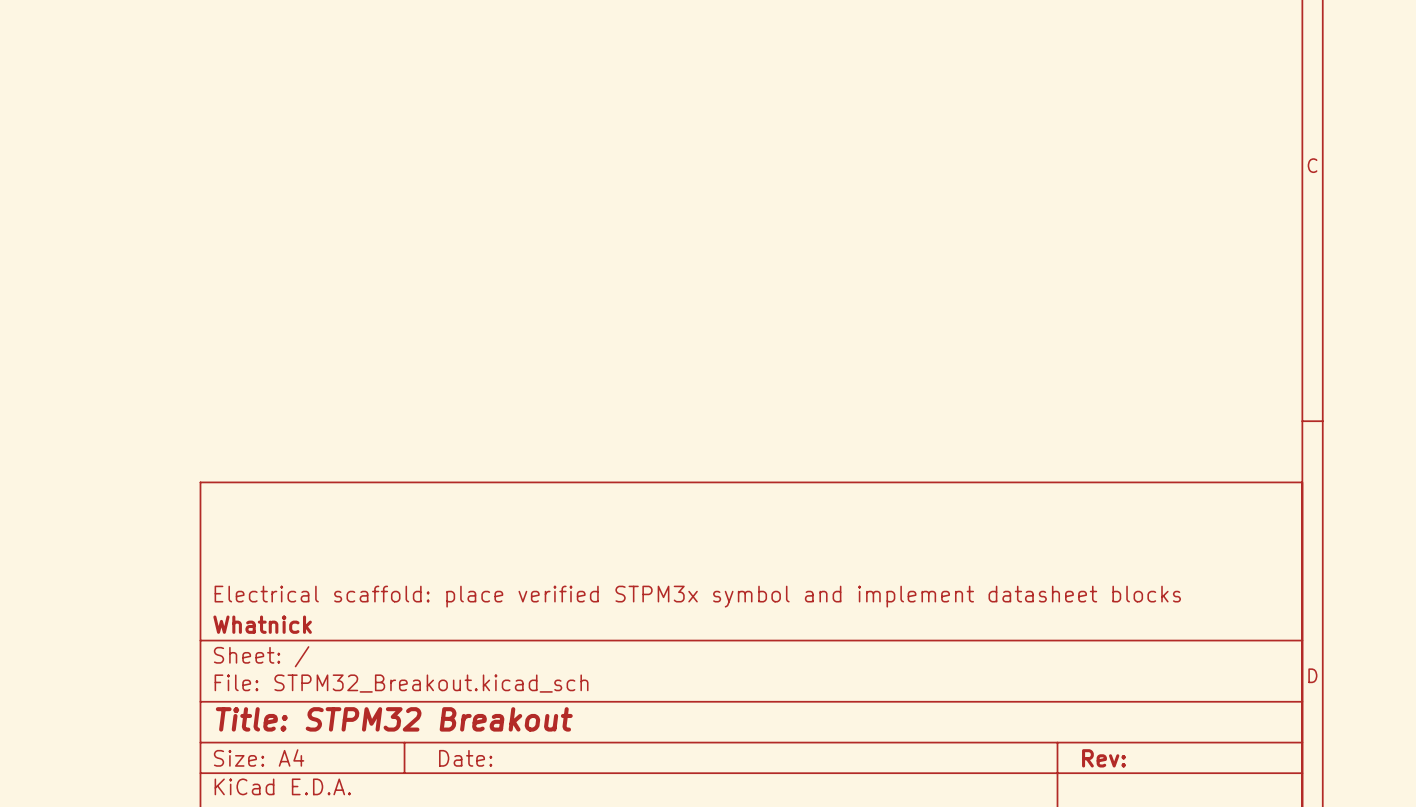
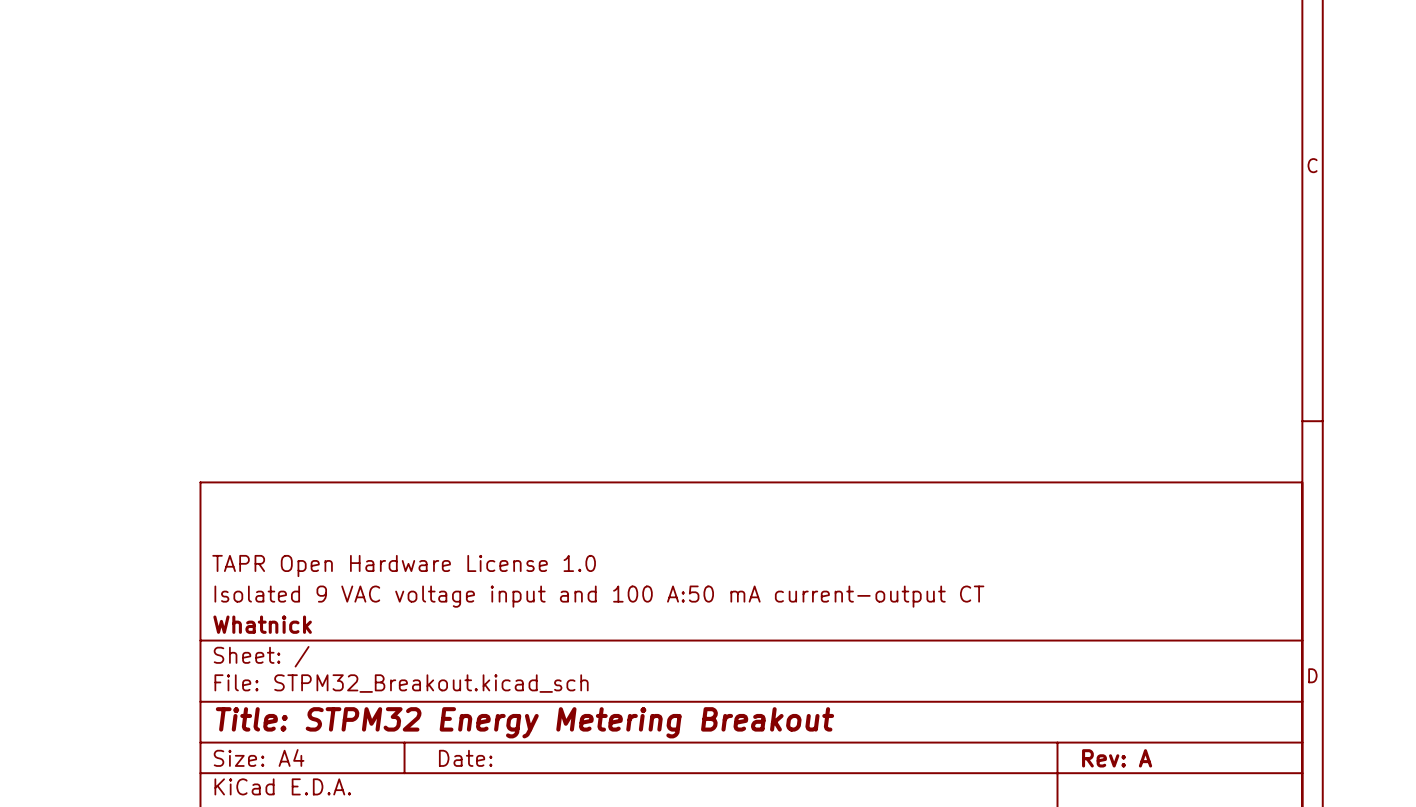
title block: none -> TAPR Open Hardware License 1.0 (404, 566)
title block: Electrical scaffold: place verified STPM3x symbol and implement datasheet blocks (697, 596) -> Isolated 9 VAC voltage input and 100 A:50 mA current-output CT (599, 596)
title block: Title: STPM32 Breakout (394, 719) -> Title: STPM32 Energy Metering Breakout (524, 722)
title block: Rev: (1103, 758) -> Rev: A (1117, 758)

